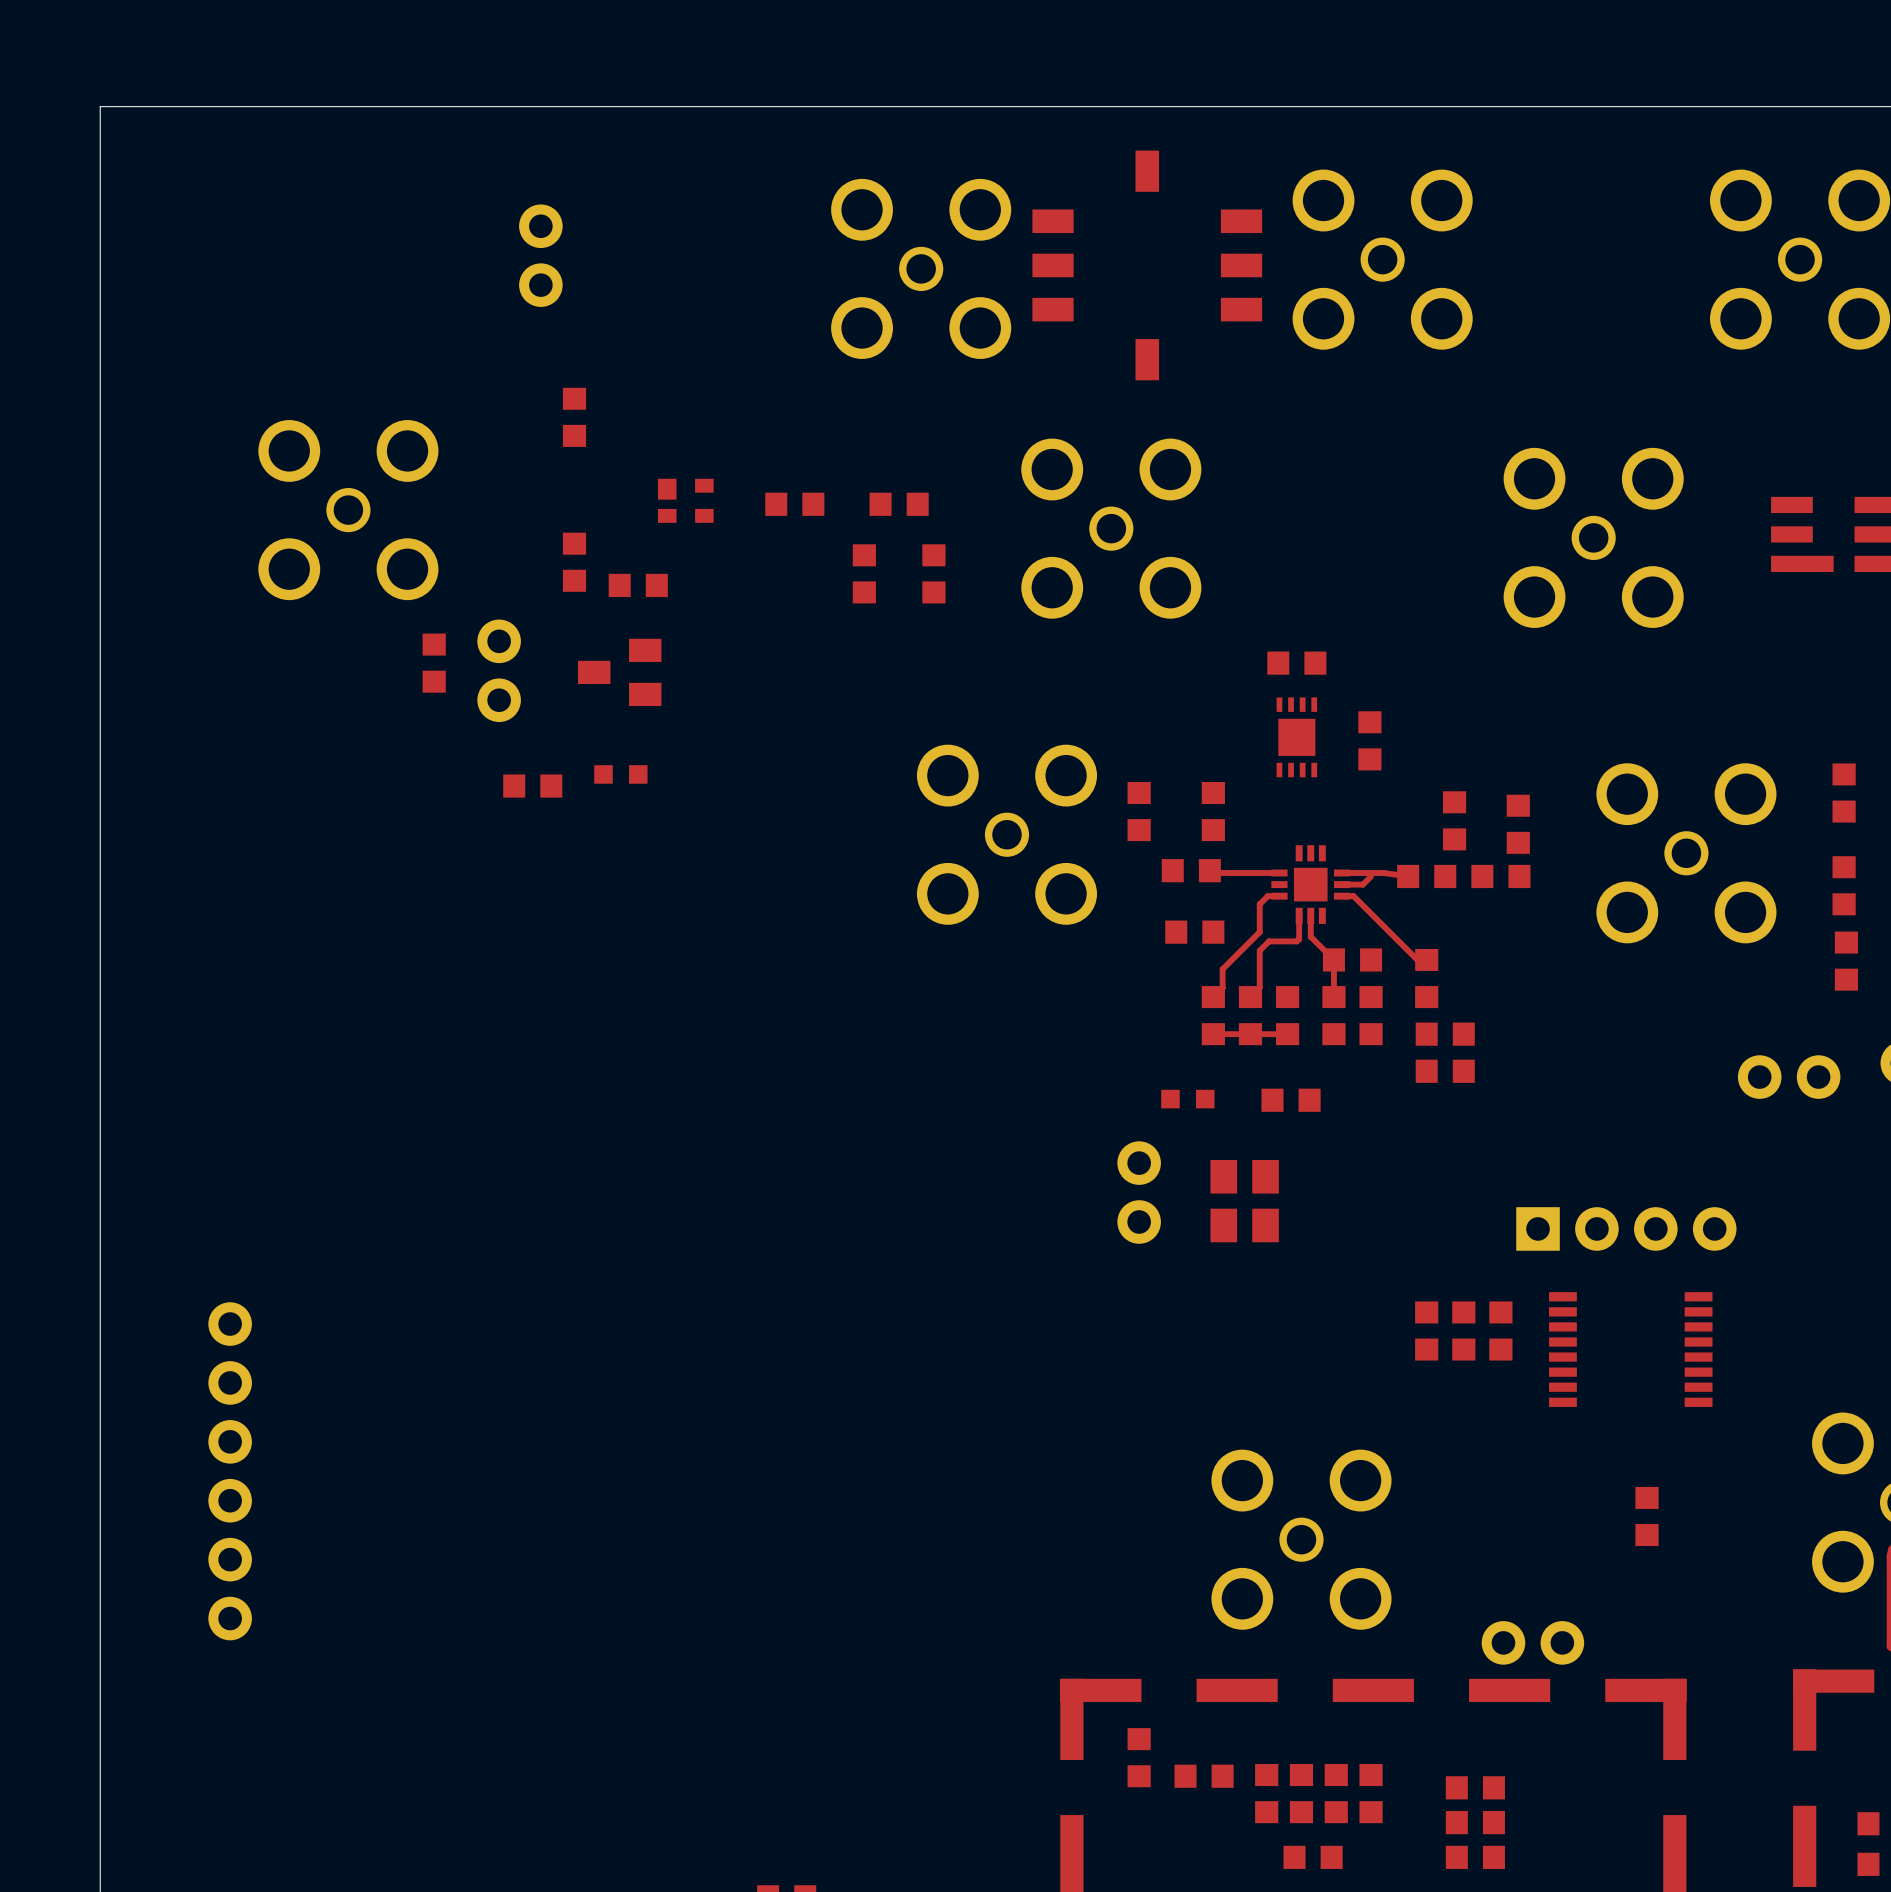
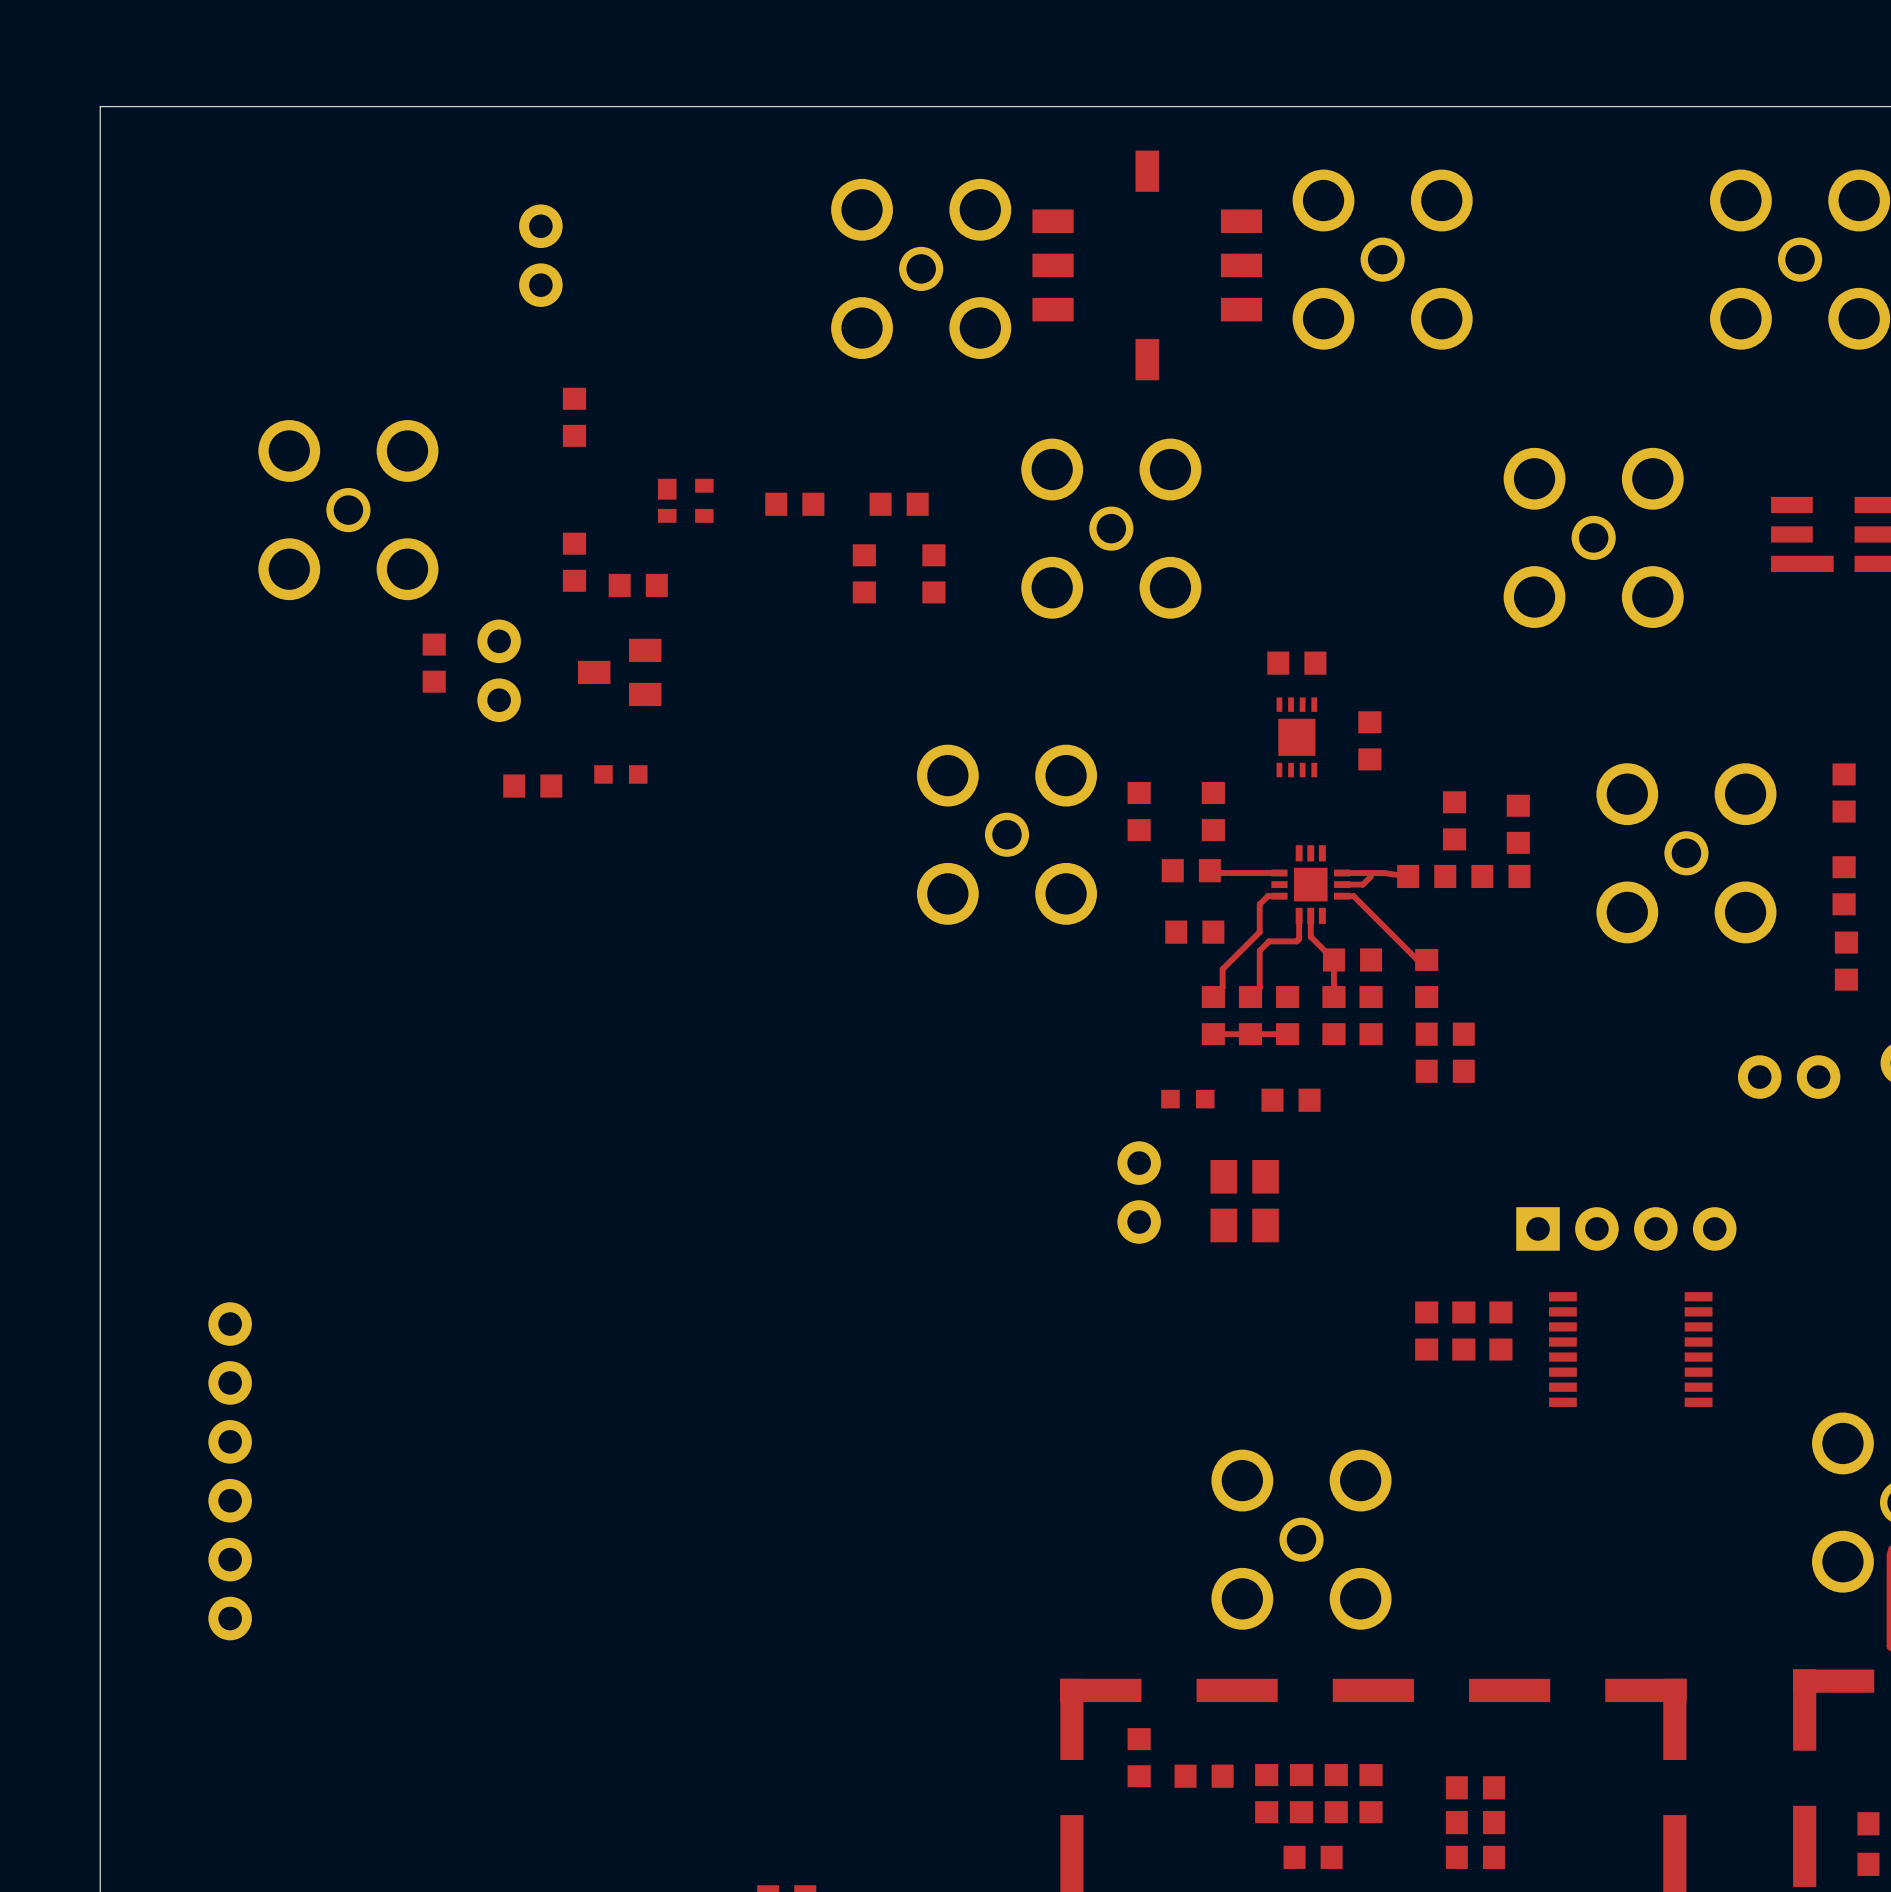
part: (1647, 1516) -> none
part: (1532, 1642) -> none

